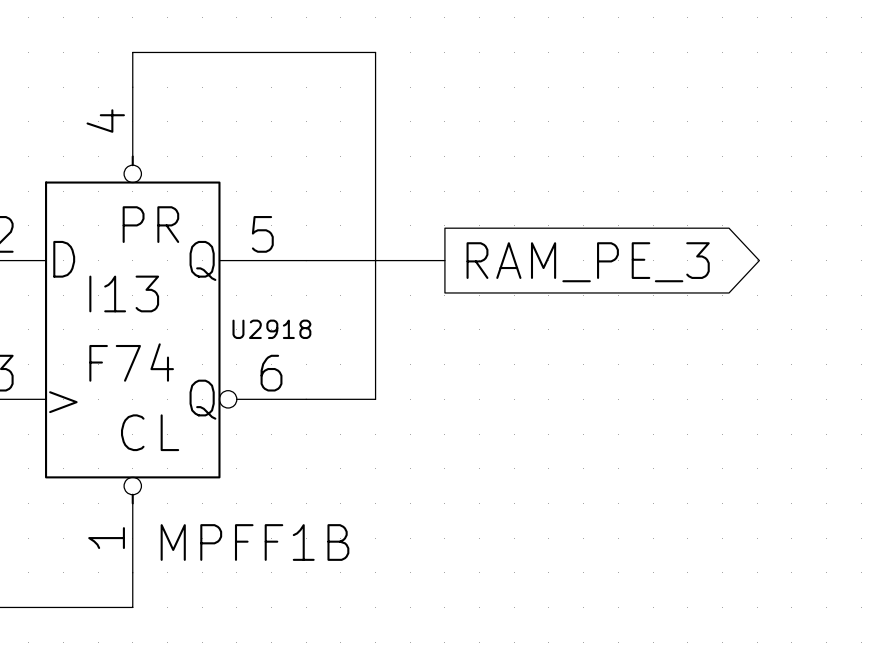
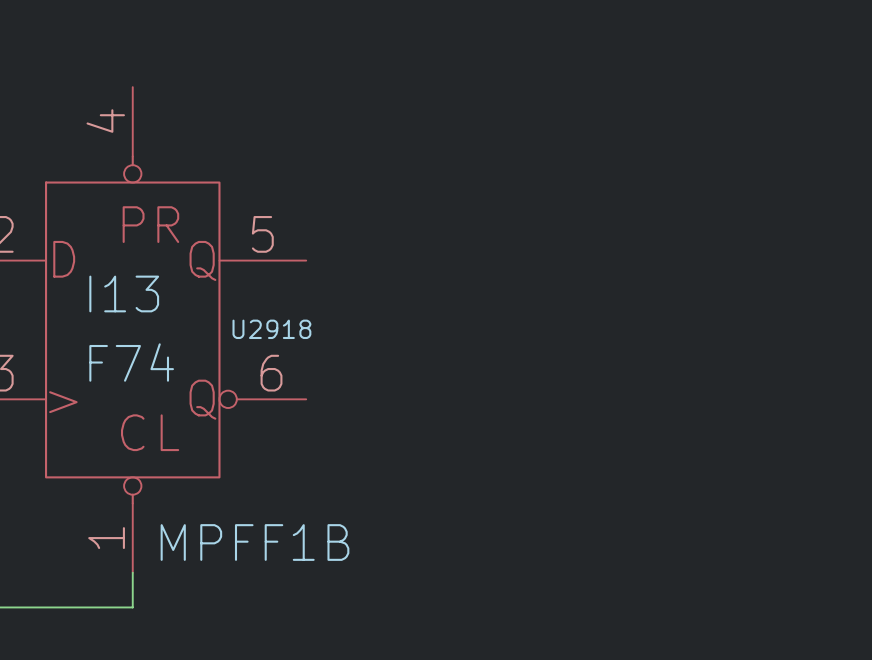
wire: (132, 87) (132, 52) (375, 52) (375, 399) (306, 399) -> none
wire: (306, 260) (444, 260) -> none
global label: RAM_PE_3 (588, 262) -> none

